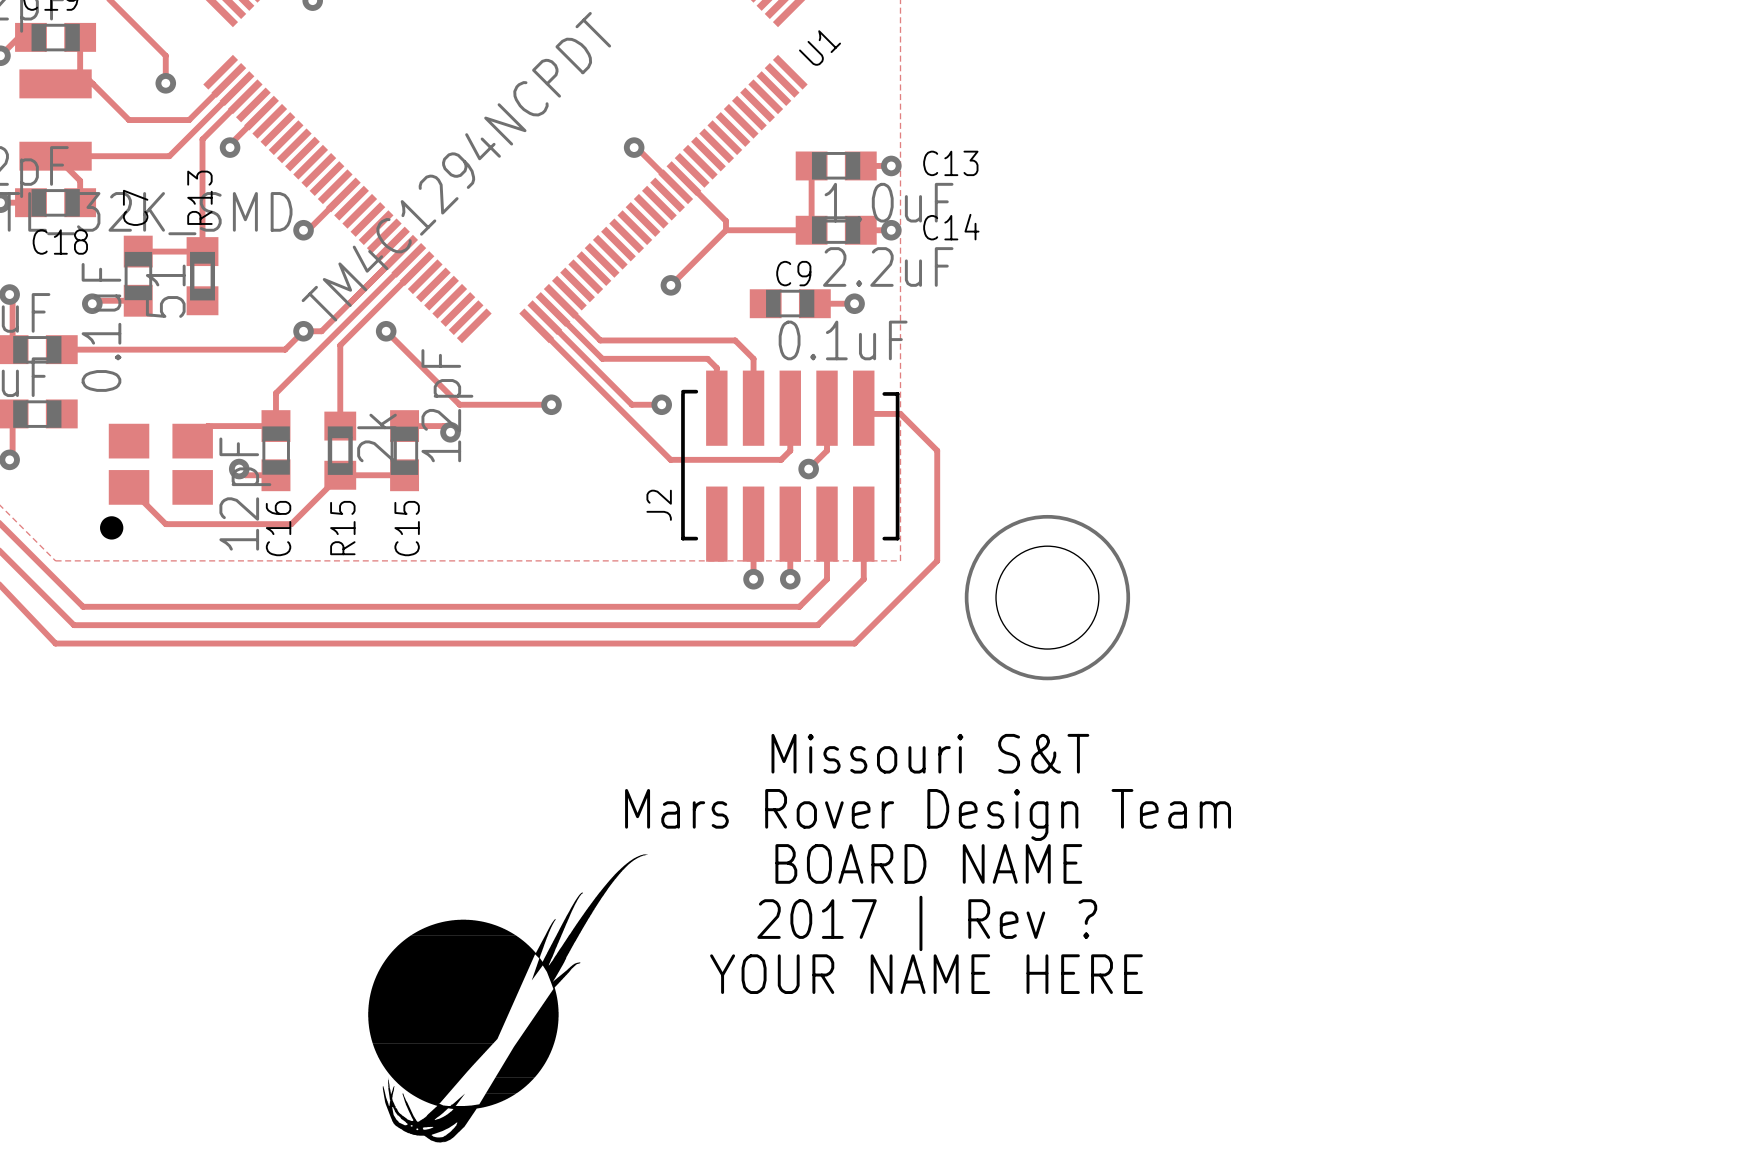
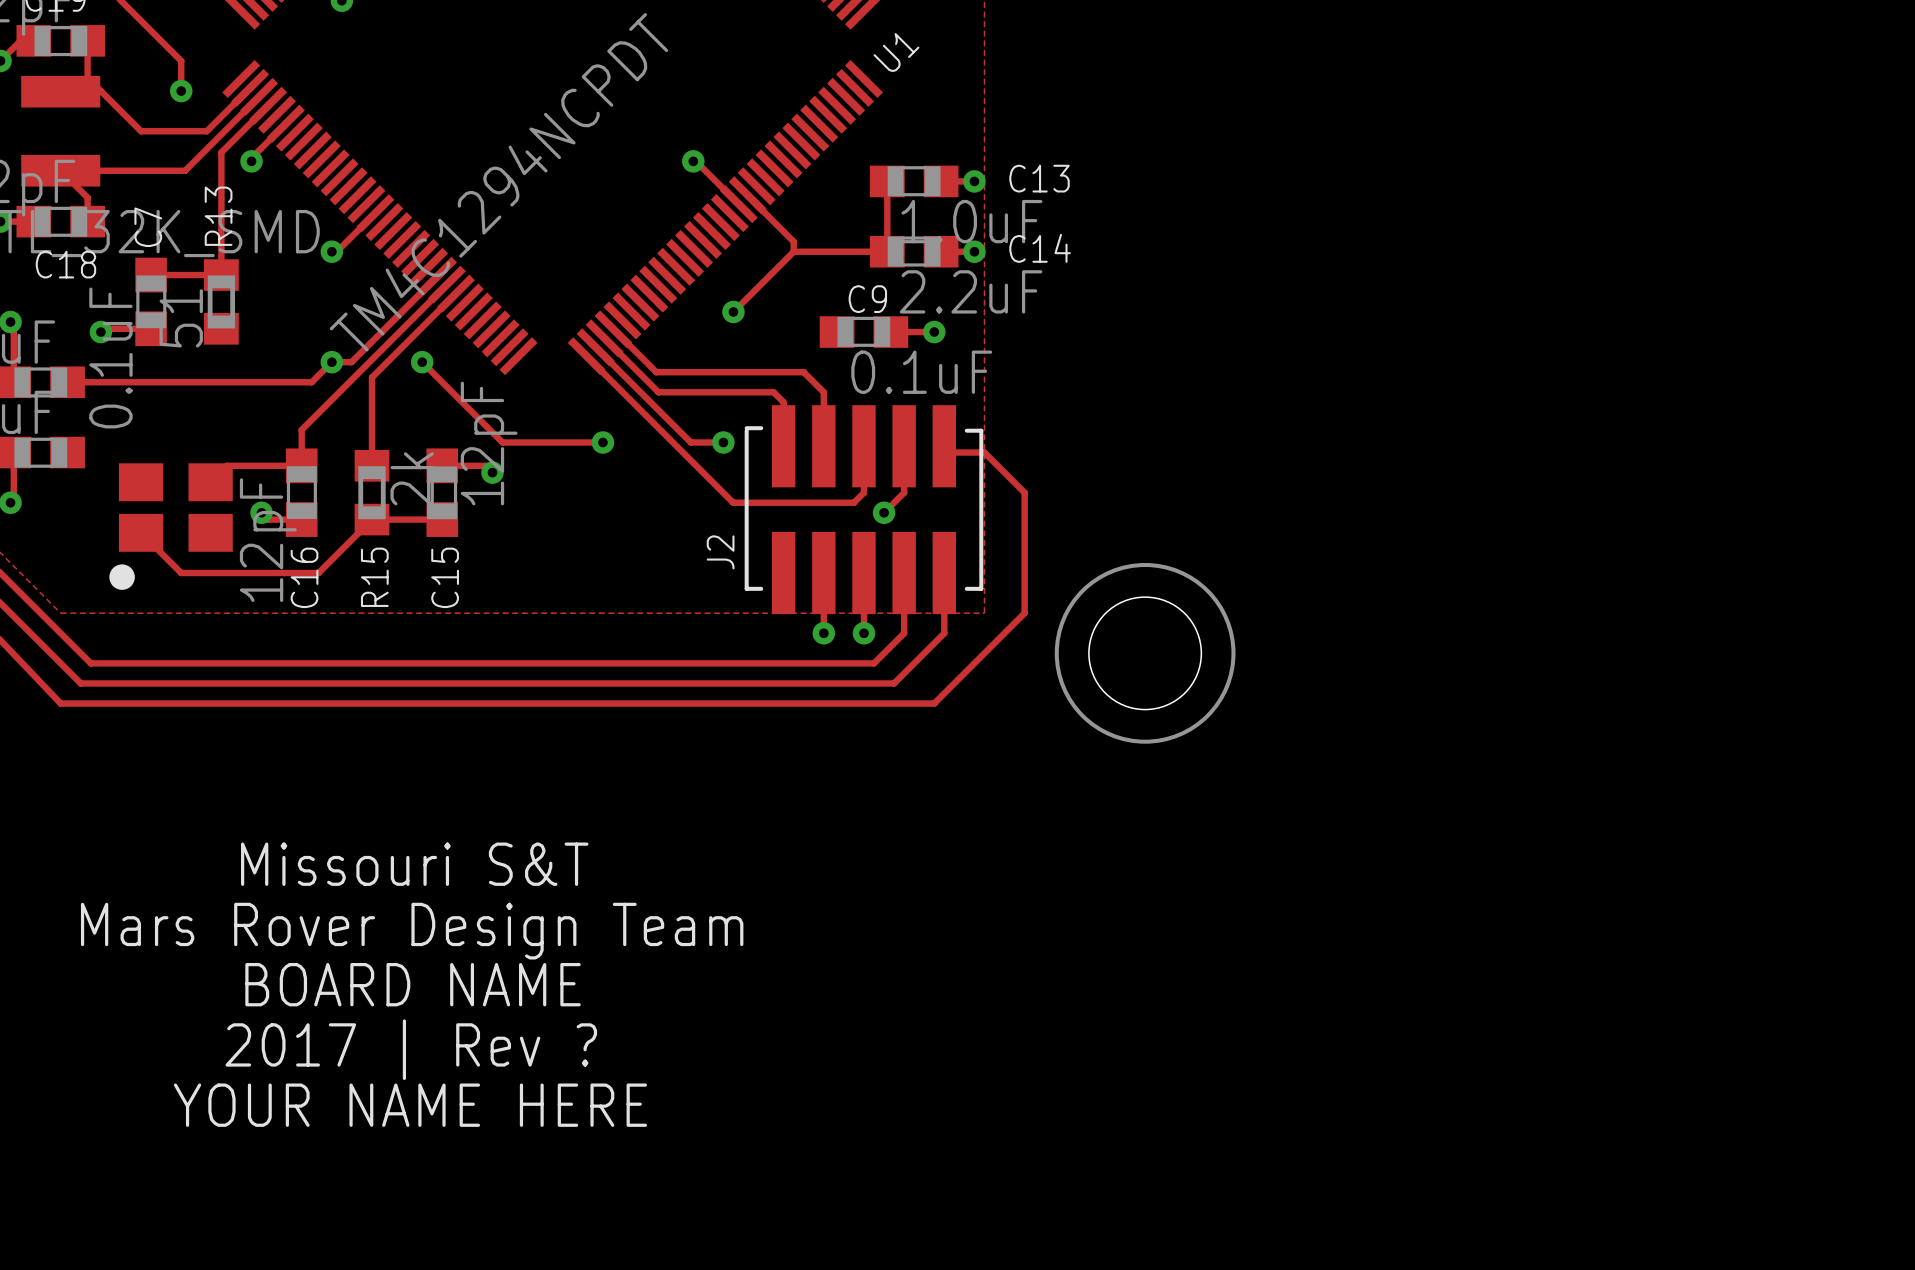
text position: Missouri S&T (930, 753) -> Missouri S&T (414, 864)
text position: Mars Rover Design Team (928, 814) -> Mars Rover Design Team (412, 931)
drawing: [368, 854, 648, 1143] -> none
text position: BOARD NAME (928, 863) -> BOARD NAME (413, 984)
text position: 2017 | Rev ? (927, 923) -> 2017 | Rev ? (411, 1049)
text position: YOUR NAME HERE (926, 974) -> YOUR NAME HERE (410, 1105)

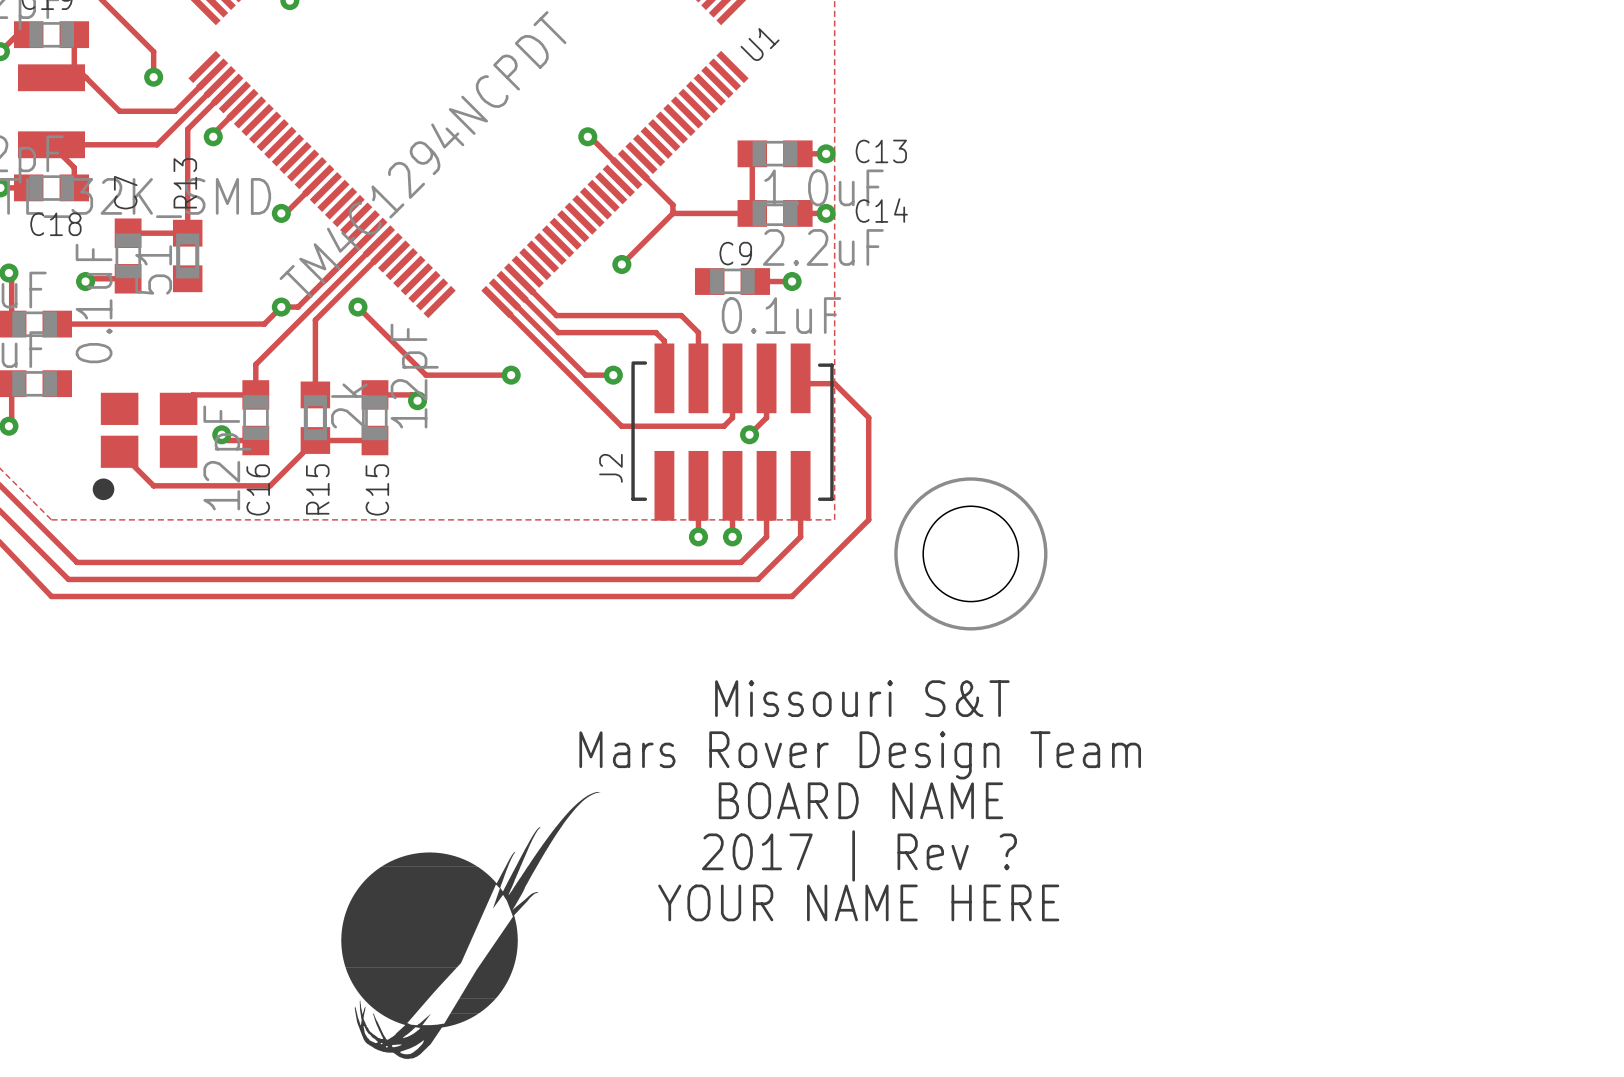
text position: Missouri S&T (414, 864) -> Missouri S&T (862, 698)
text position: Mars Rover Design Team (412, 931) -> Mars Rover Design Team (860, 755)
drawing: none -> [341, 791, 601, 1060]
text position: BOARD NAME (413, 984) -> BOARD NAME (860, 800)
text position: 2017 | Rev ? (411, 1049) -> 2017 | Rev ? (859, 855)
text position: YOUR NAME HERE (410, 1105) -> YOUR NAME HERE (858, 902)

